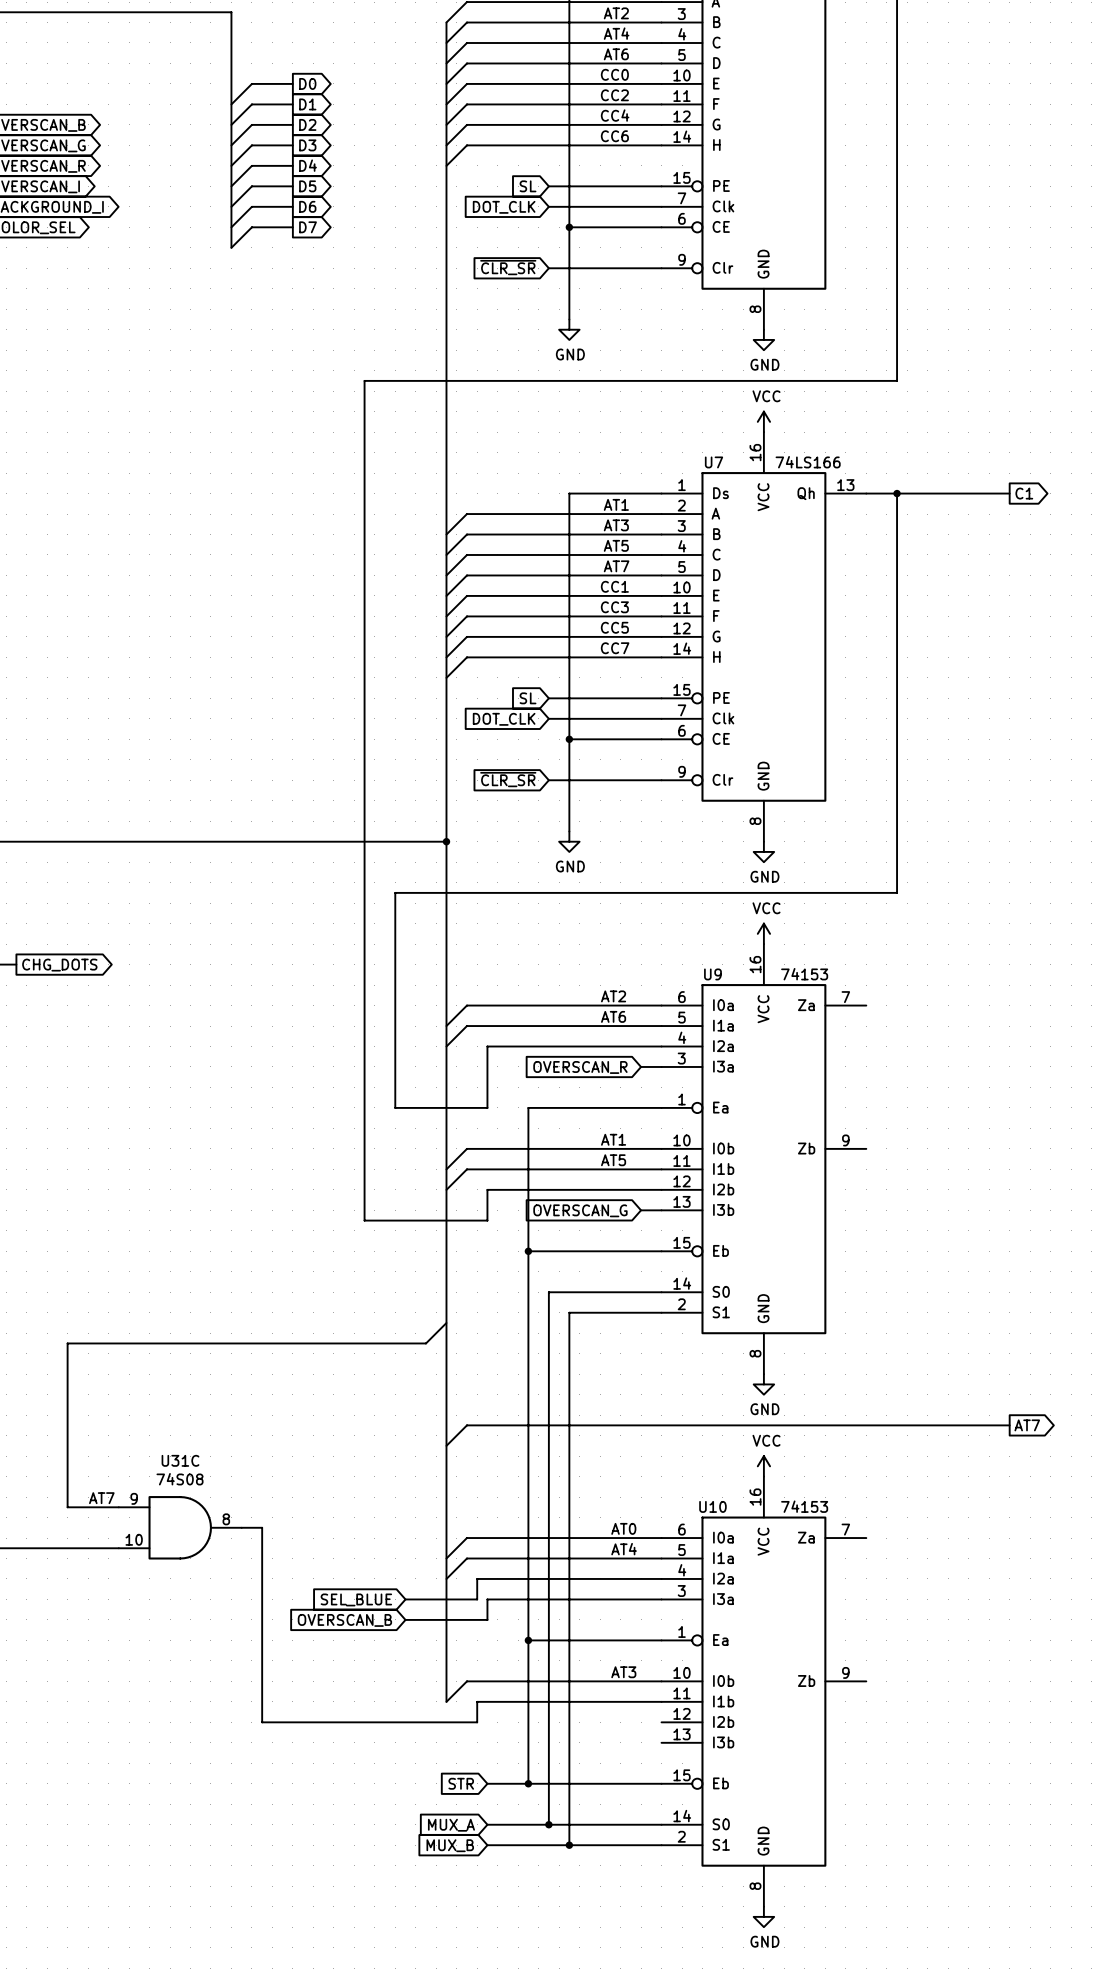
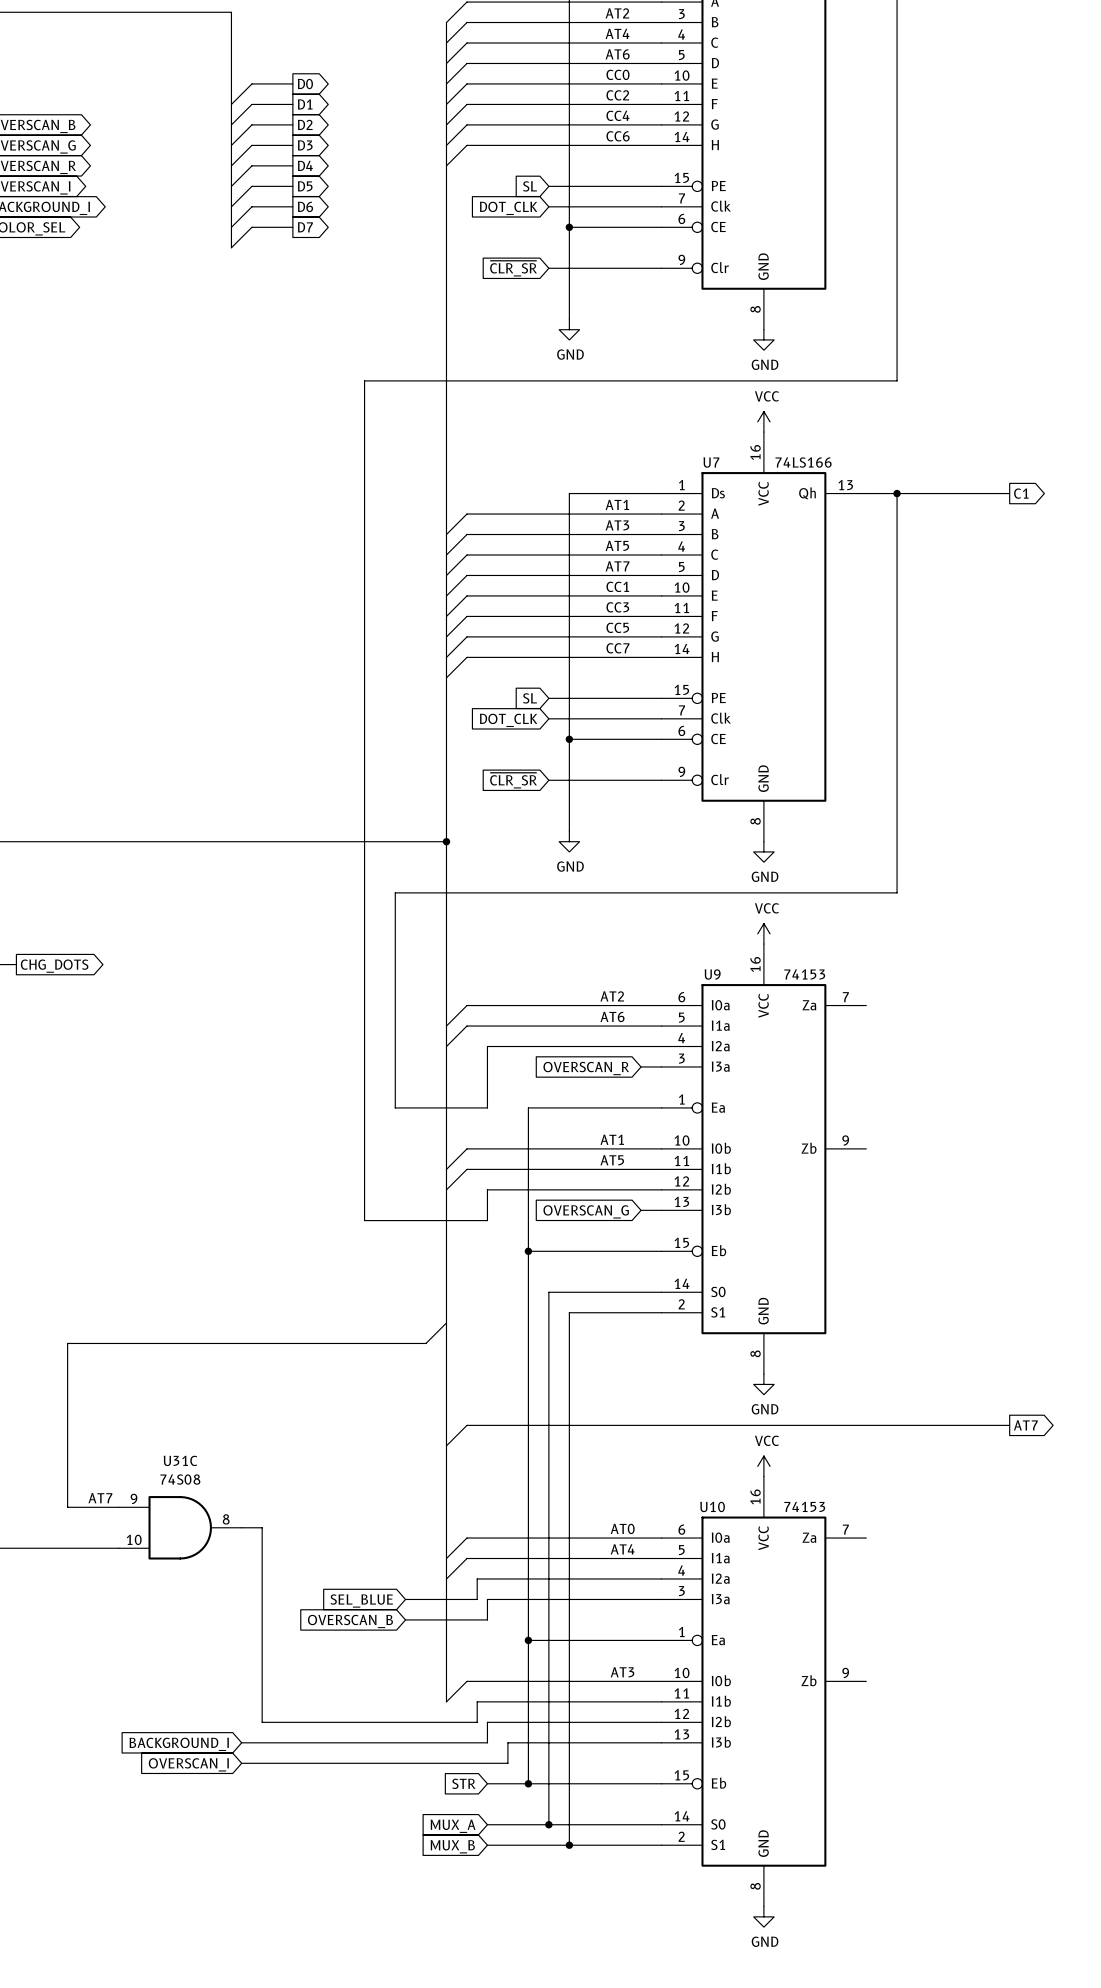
wire: none -> (661, 1722) (487, 1722) (487, 1742) (241, 1742)
wire: none -> (661, 1742) (507, 1742) (507, 1763) (241, 1763)
global label: none -> BACKGROUND_I (179, 1744)
global label: none -> OVERSCAN_I (188, 1764)

